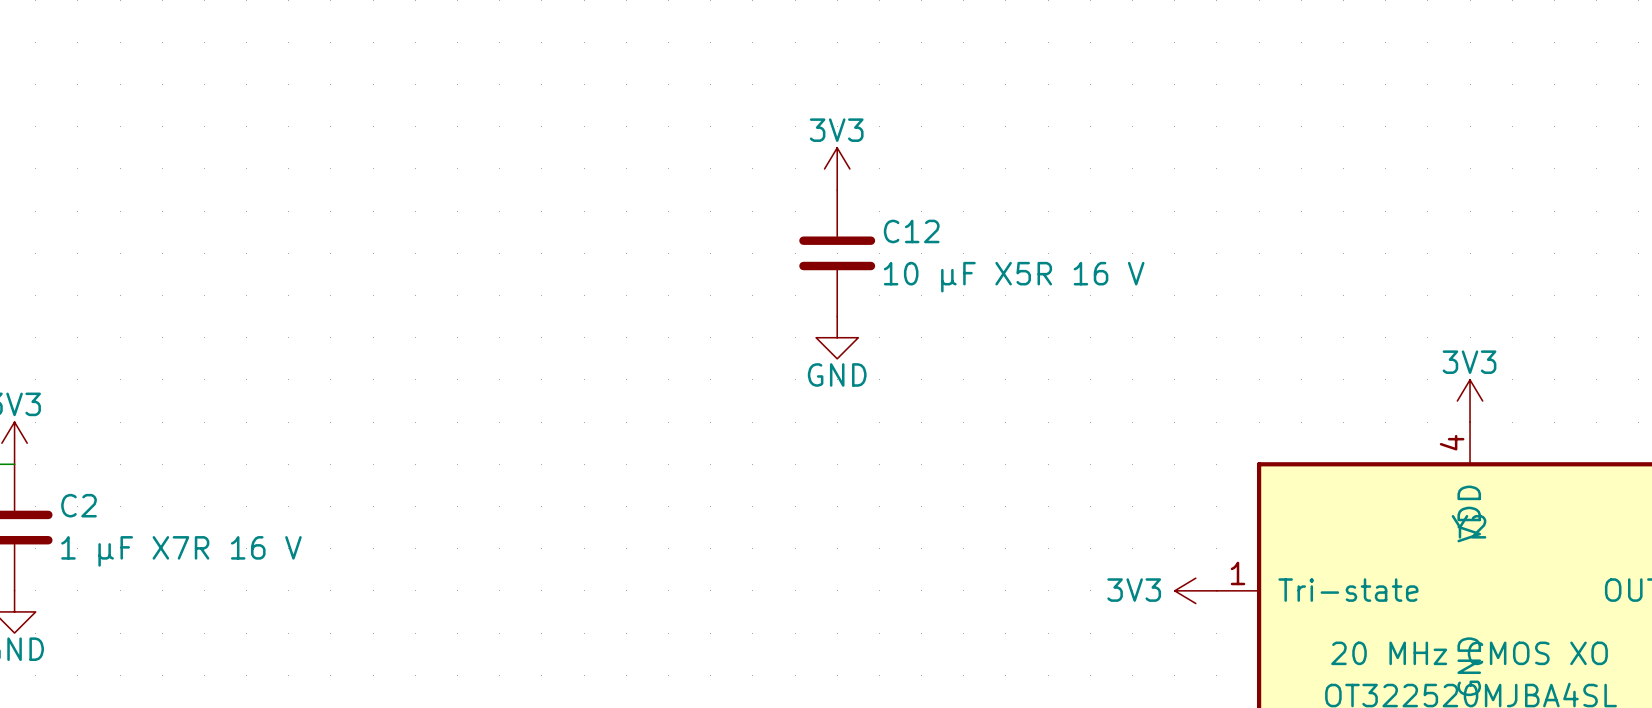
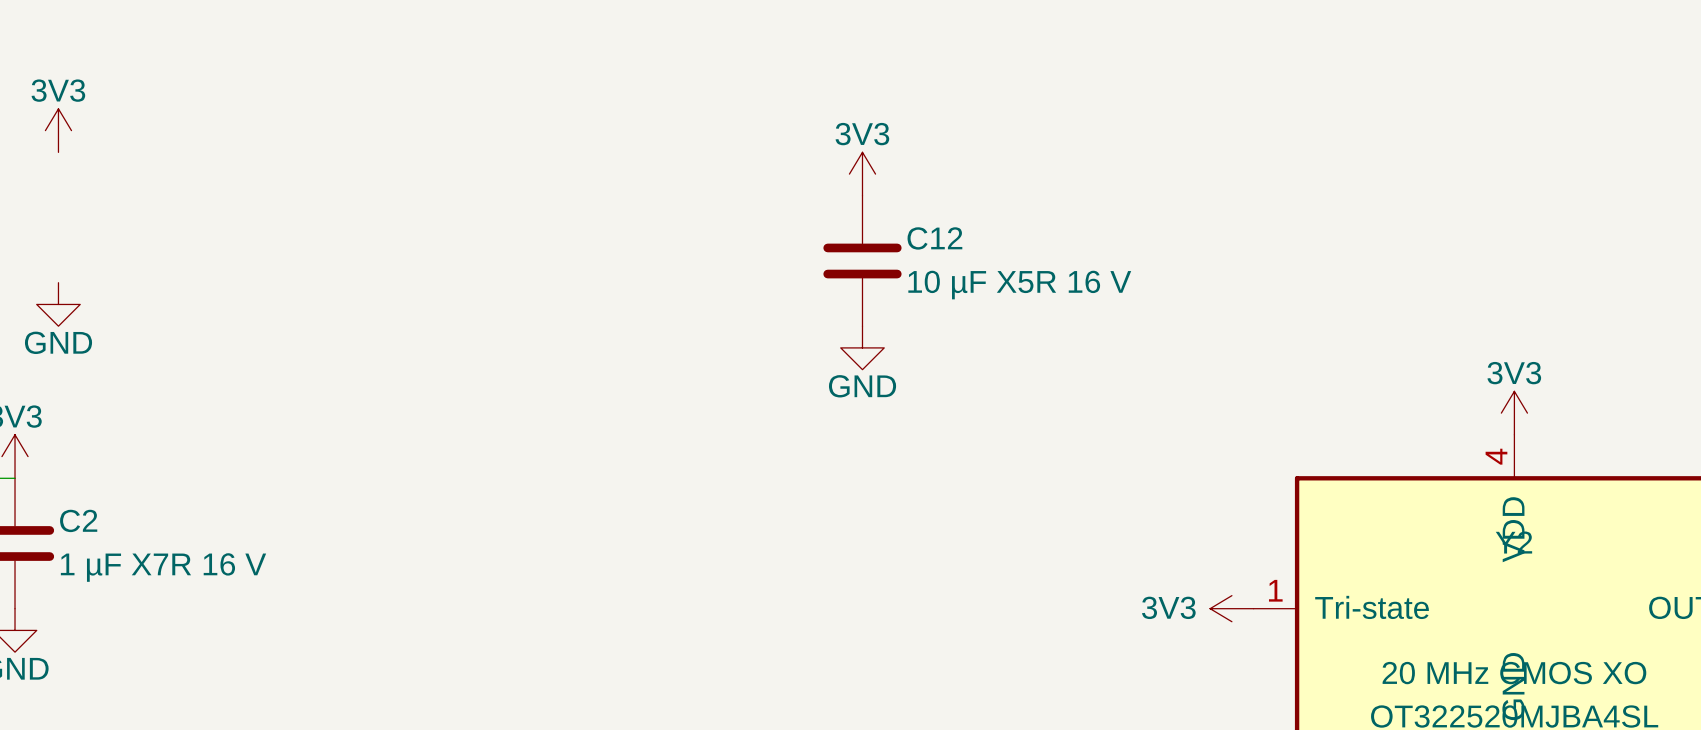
power symbol: none -> 3V3 (58, 130)
power symbol: none -> GND (58, 304)

